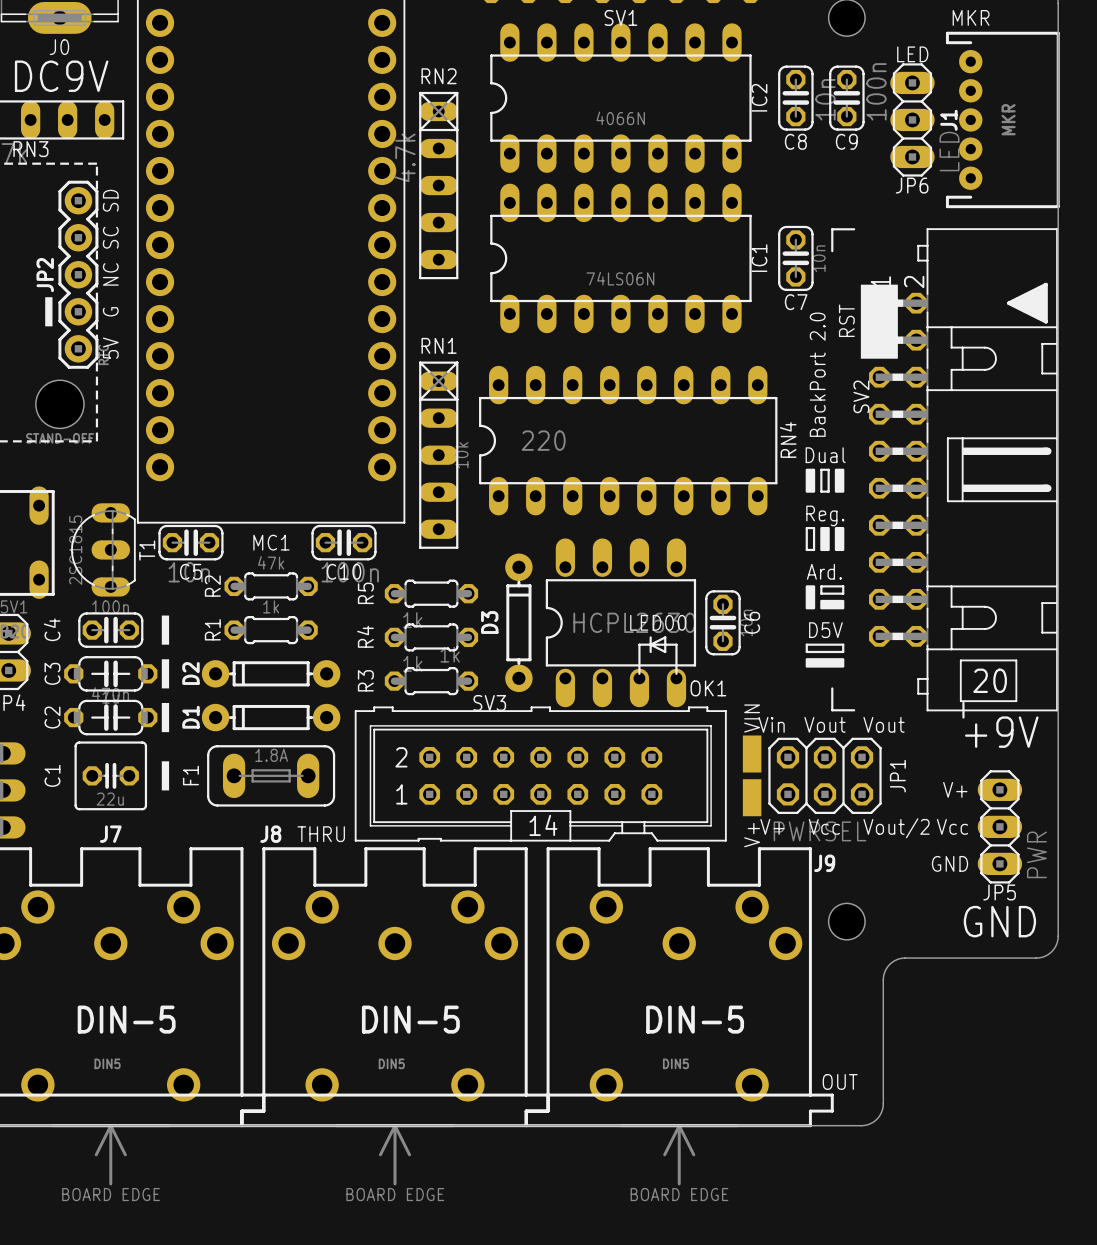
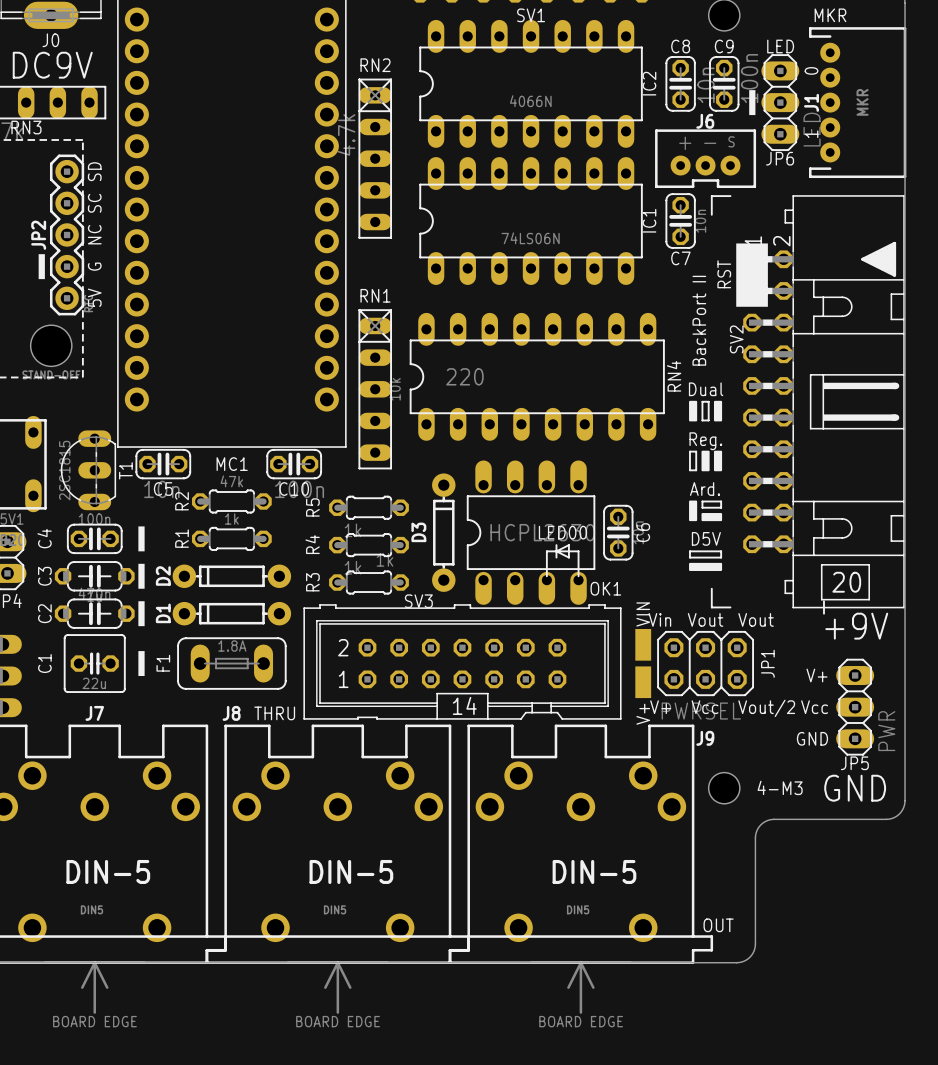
text: none -> 0 (811, 70)
drawing: none -> [749, 90, 756, 116]
C8 name position: C8 (795, 141) -> C8 (680, 46)
C9 name position: C9 (846, 141) -> C9 (724, 46)
text: none -> 1 (811, 134)
J6: none -> (705, 158)
text: BackPort 2.0 (817, 374) -> BackPort II (699, 320)
text: none -> 4-M3 (780, 787)

